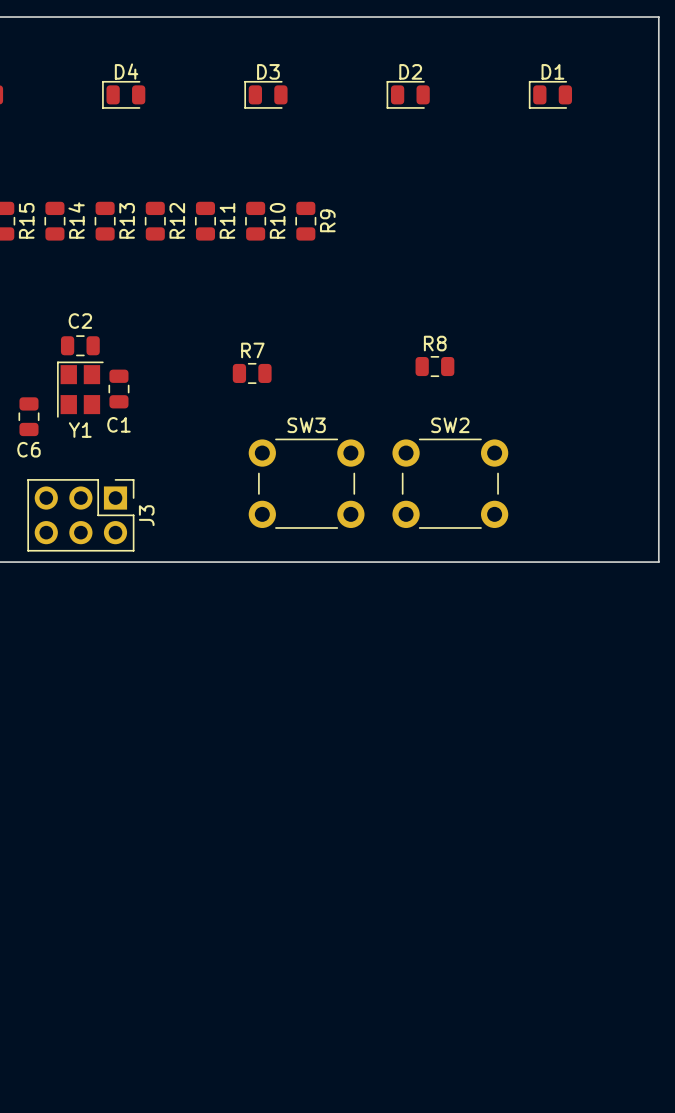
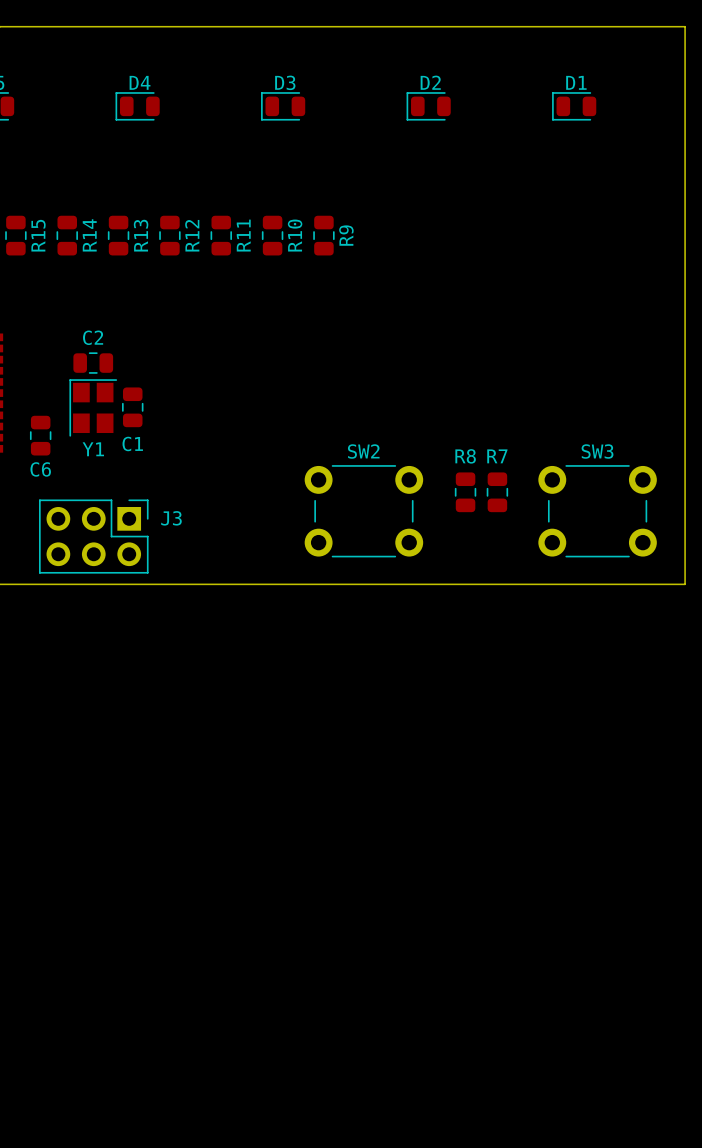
R8 rotation: 0° (434, 366) -> 90° clockwise (465, 492)
R8 position: (434, 366) -> (465, 492)
R7 rotation: 0° (252, 373) -> 90° clockwise (497, 492)
R7 position: (252, 373) -> (497, 492)
SW3 position: (306, 483) -> (597, 511)
SW2 position: (450, 483) -> (363, 511)
J3 name rotation: 0° (146, 515) -> 90° clockwise (171, 518)

